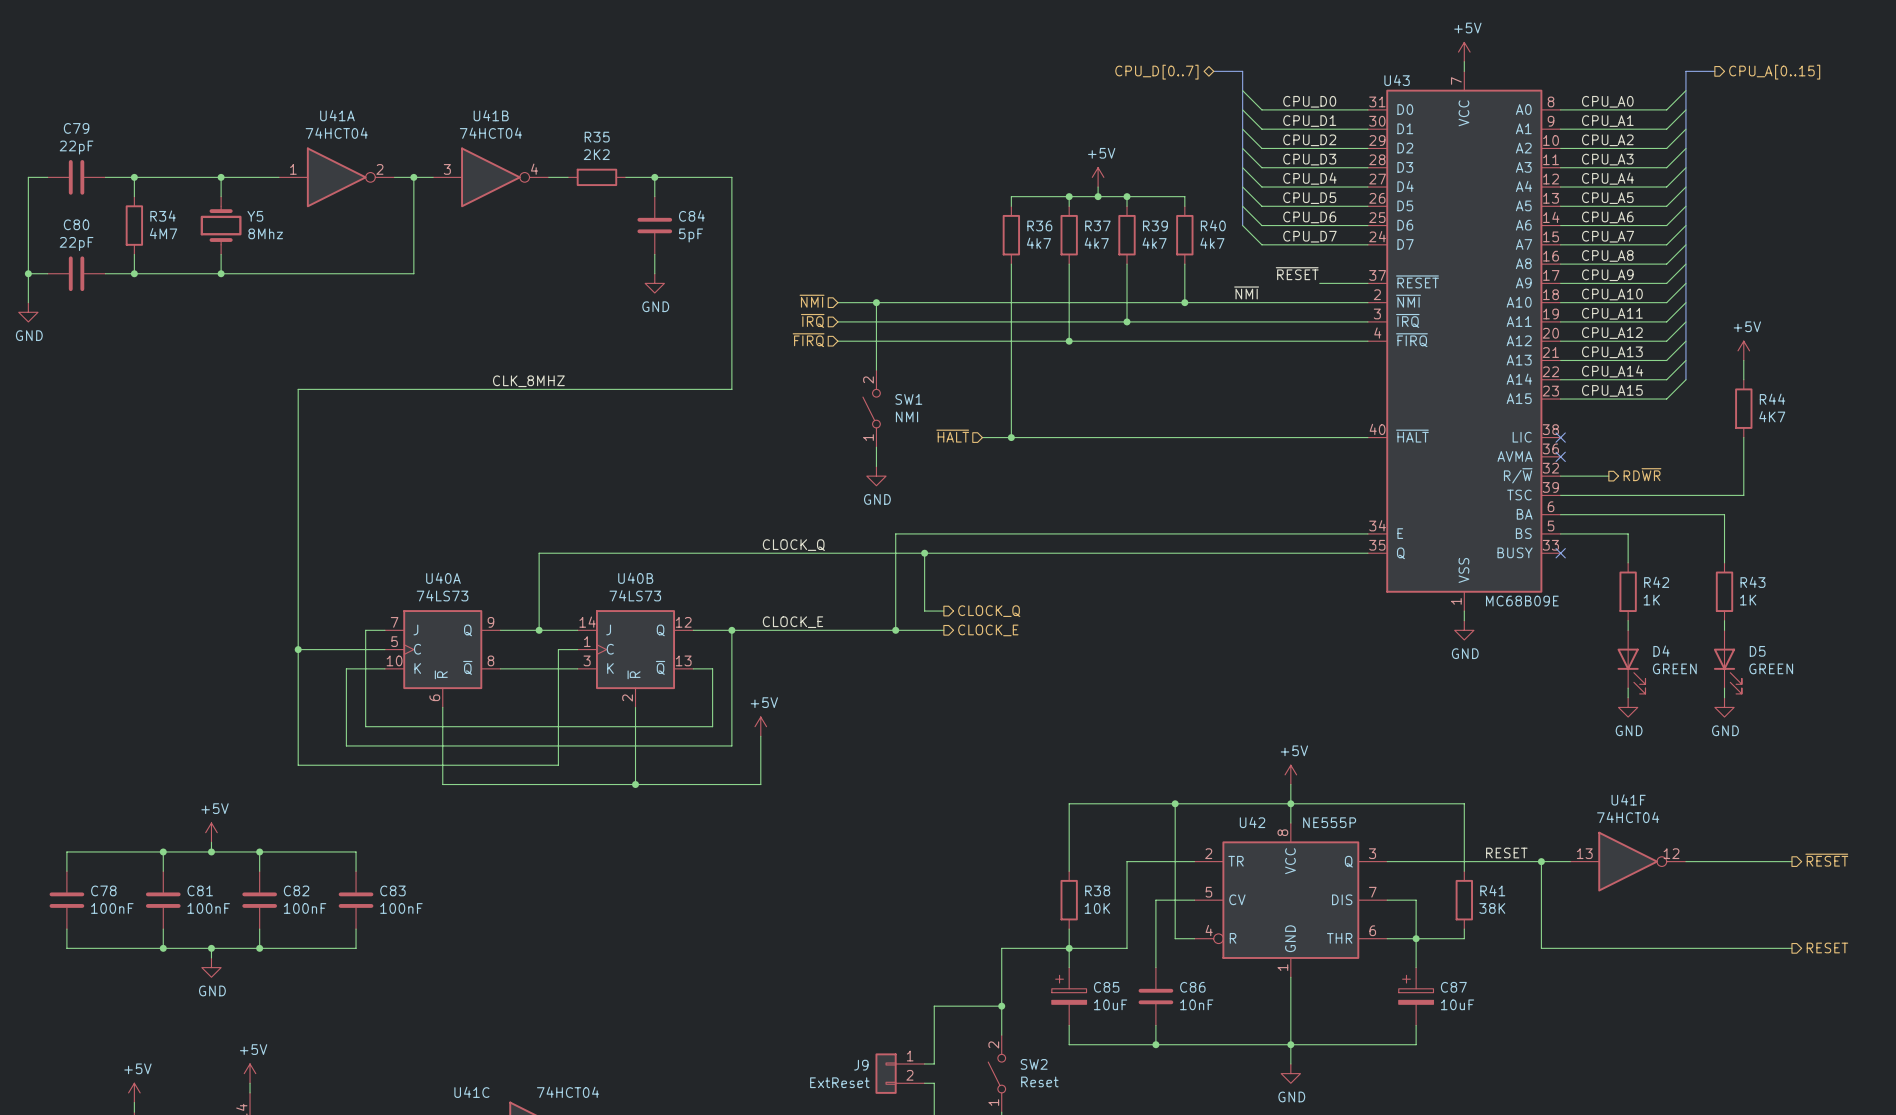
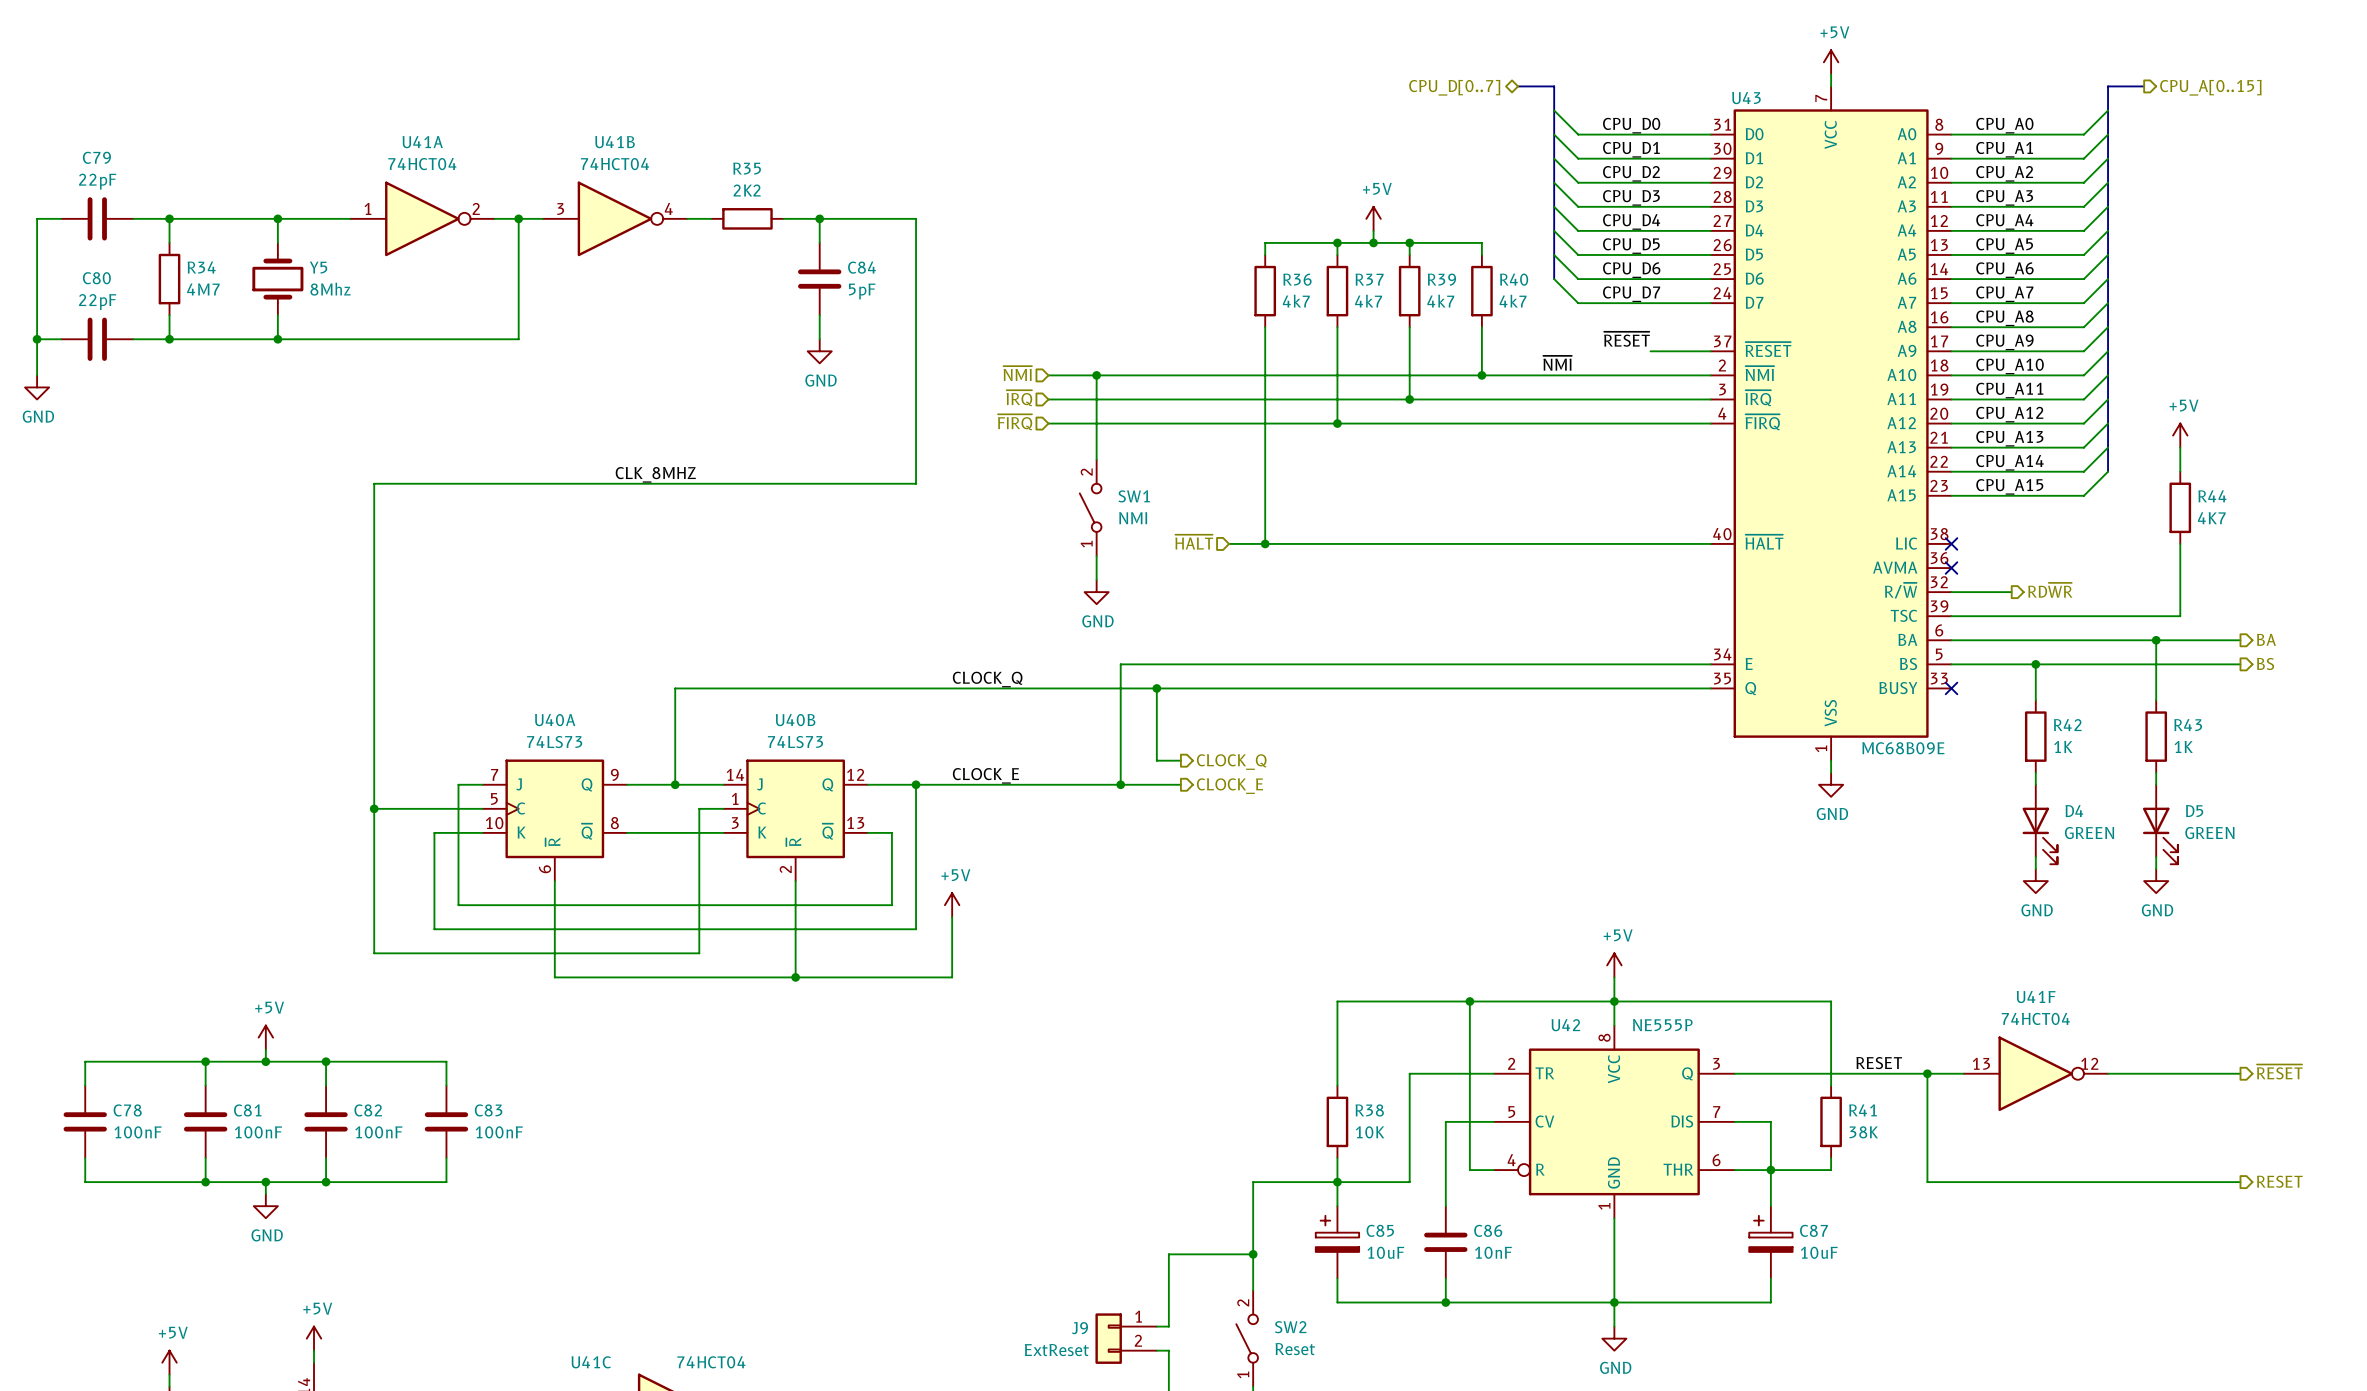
wire: none -> (2156, 640) (2240, 640)
junction: none -> (2156, 640)
hierarchical label: none -> BA (2266, 639)
wire: none -> (2035, 664) (2240, 664)
junction: none -> (2035, 664)
hierarchical label: none -> BS (2265, 663)

